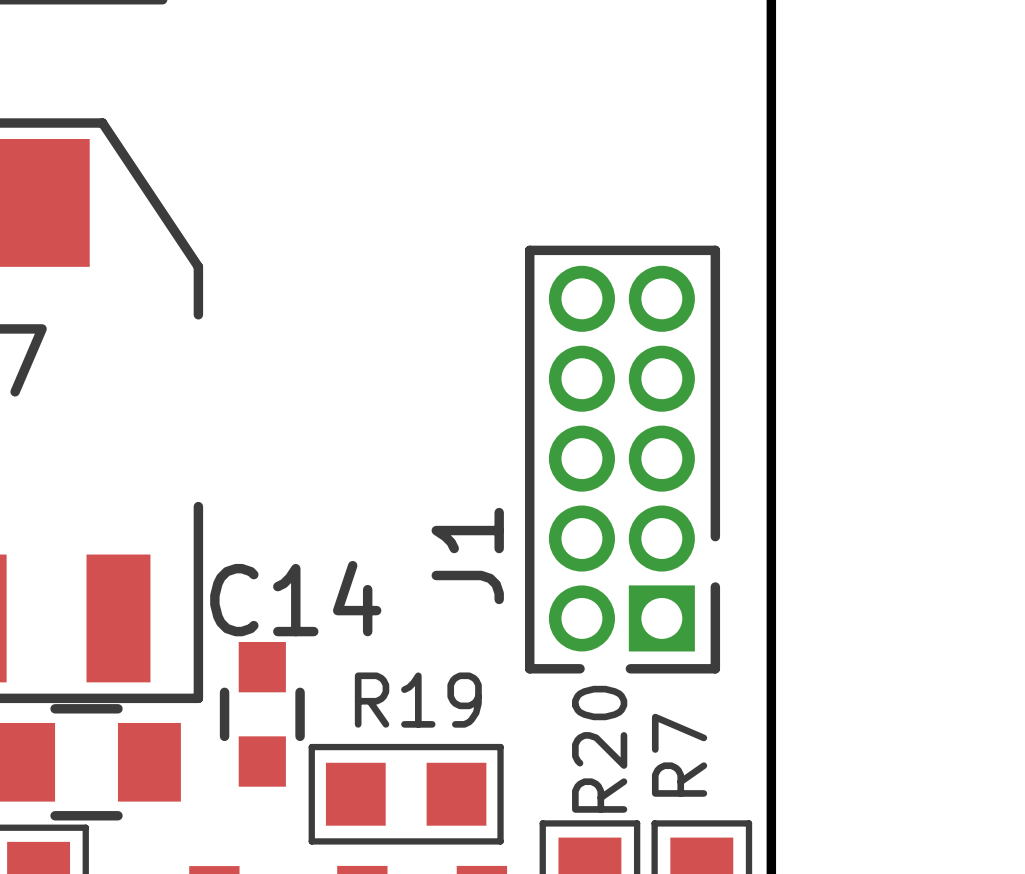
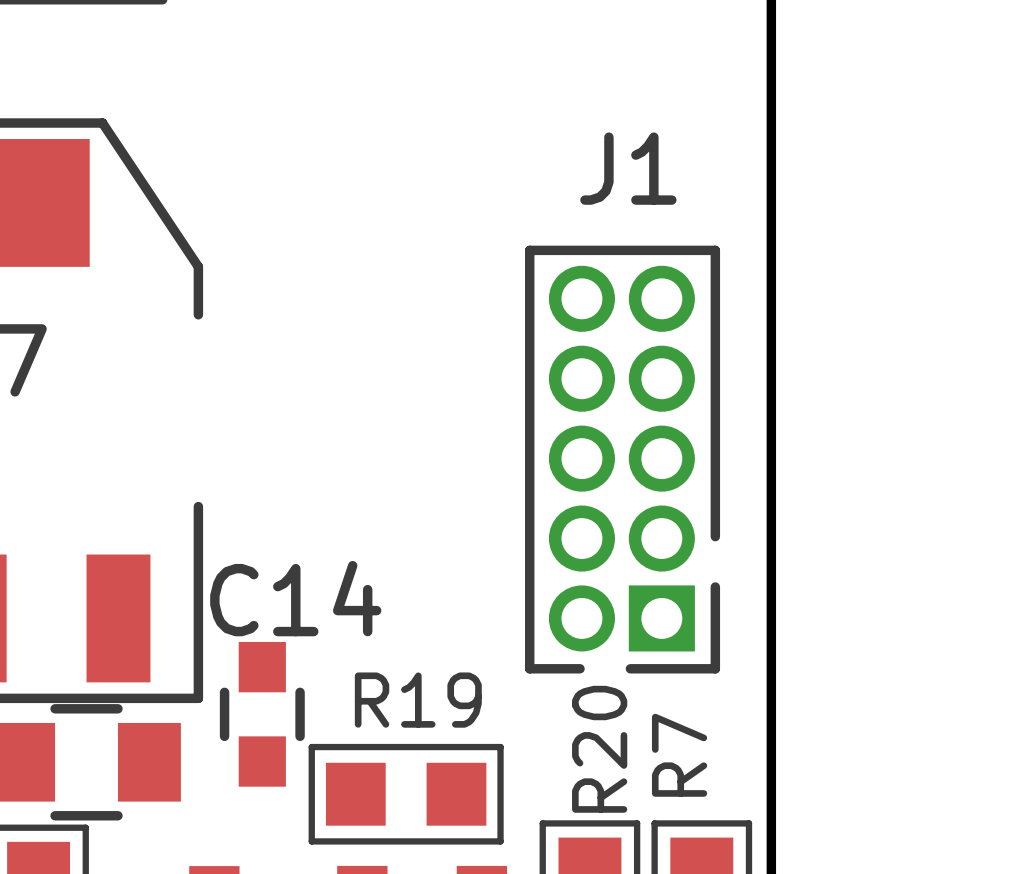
J1 name rotation: 0° (467, 556) -> 90° clockwise (628, 168)
J1 name position: J1 (467, 556) -> J1 (628, 168)

